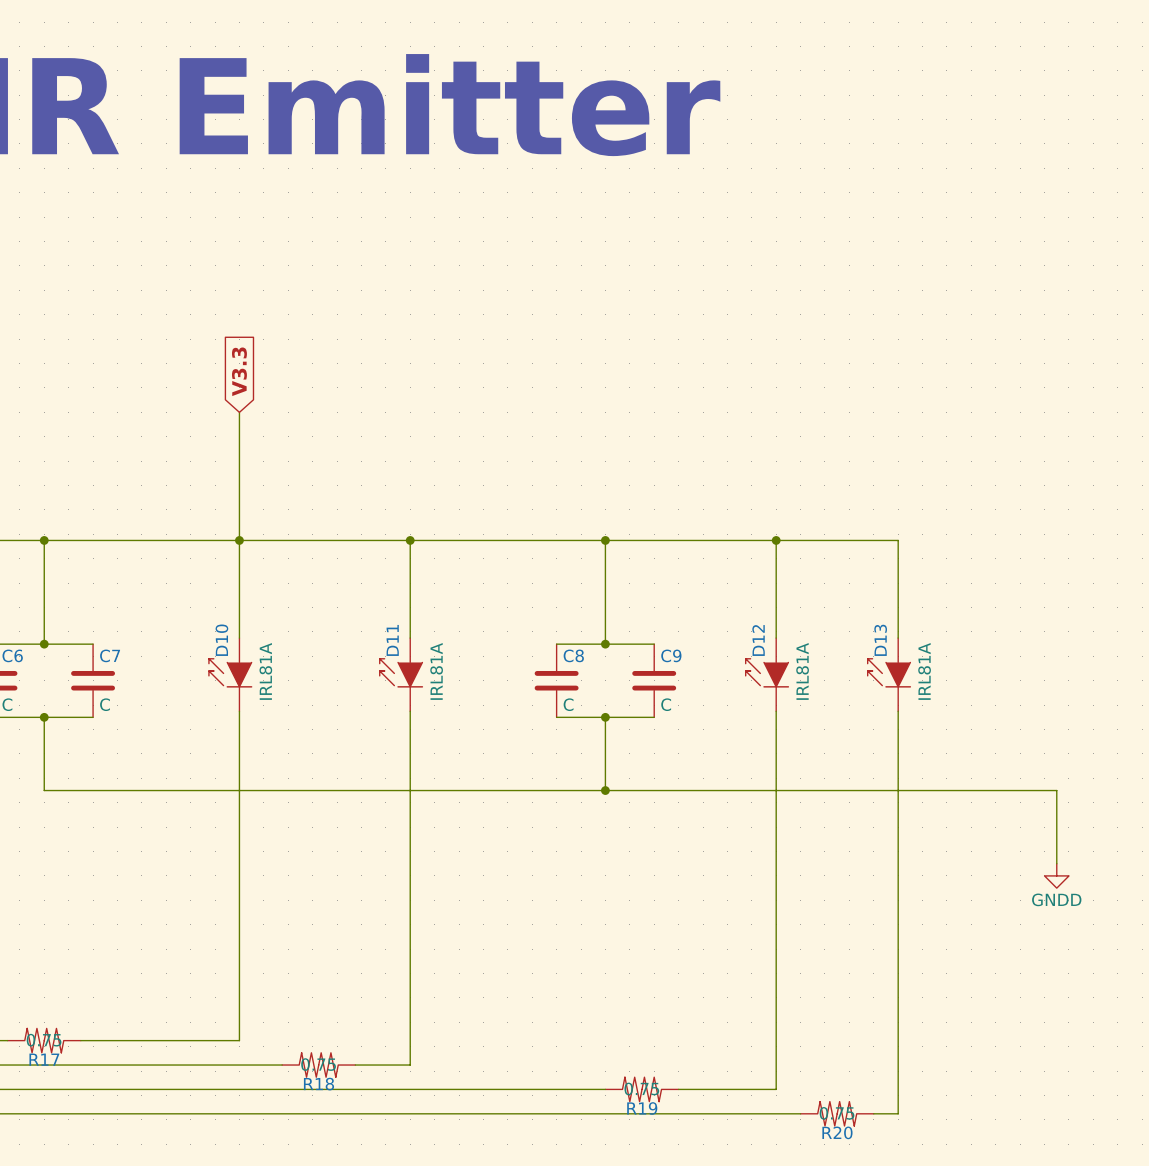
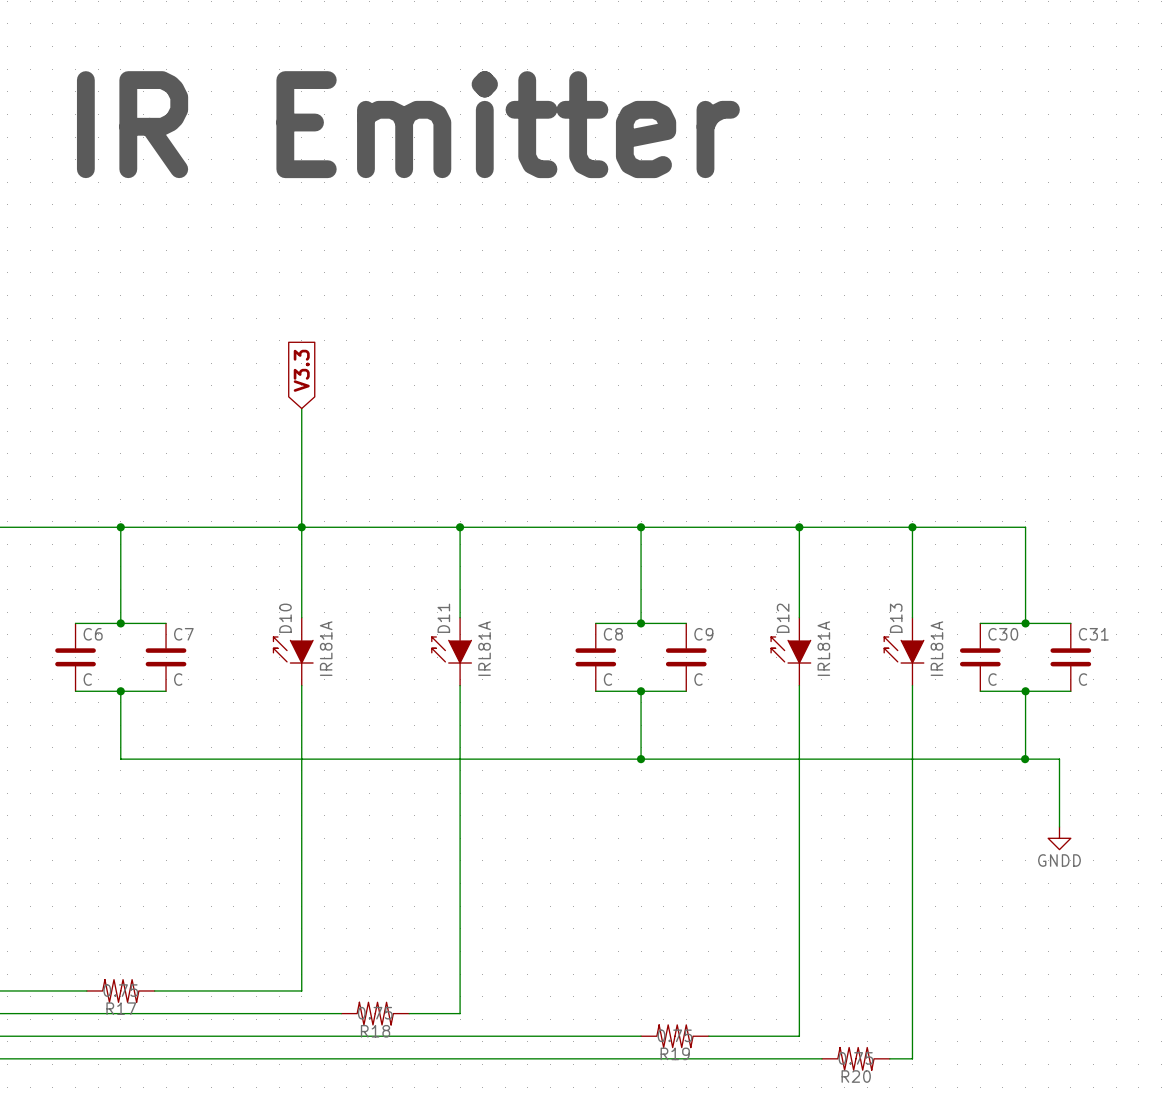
wire: none -> (912, 527) (1025, 527) (1025, 623)
junction: none -> (912, 527)
wire: none -> (980, 623) (1070, 623)
junction: none -> (1025, 623)
C30: none -> C (980, 657)
C31: none -> C (1070, 657)
wire: none -> (980, 691) (1070, 691)
junction: none -> (1025, 691)
wire: none -> (1025, 692) (1025, 759)
junction: none -> (1025, 759)

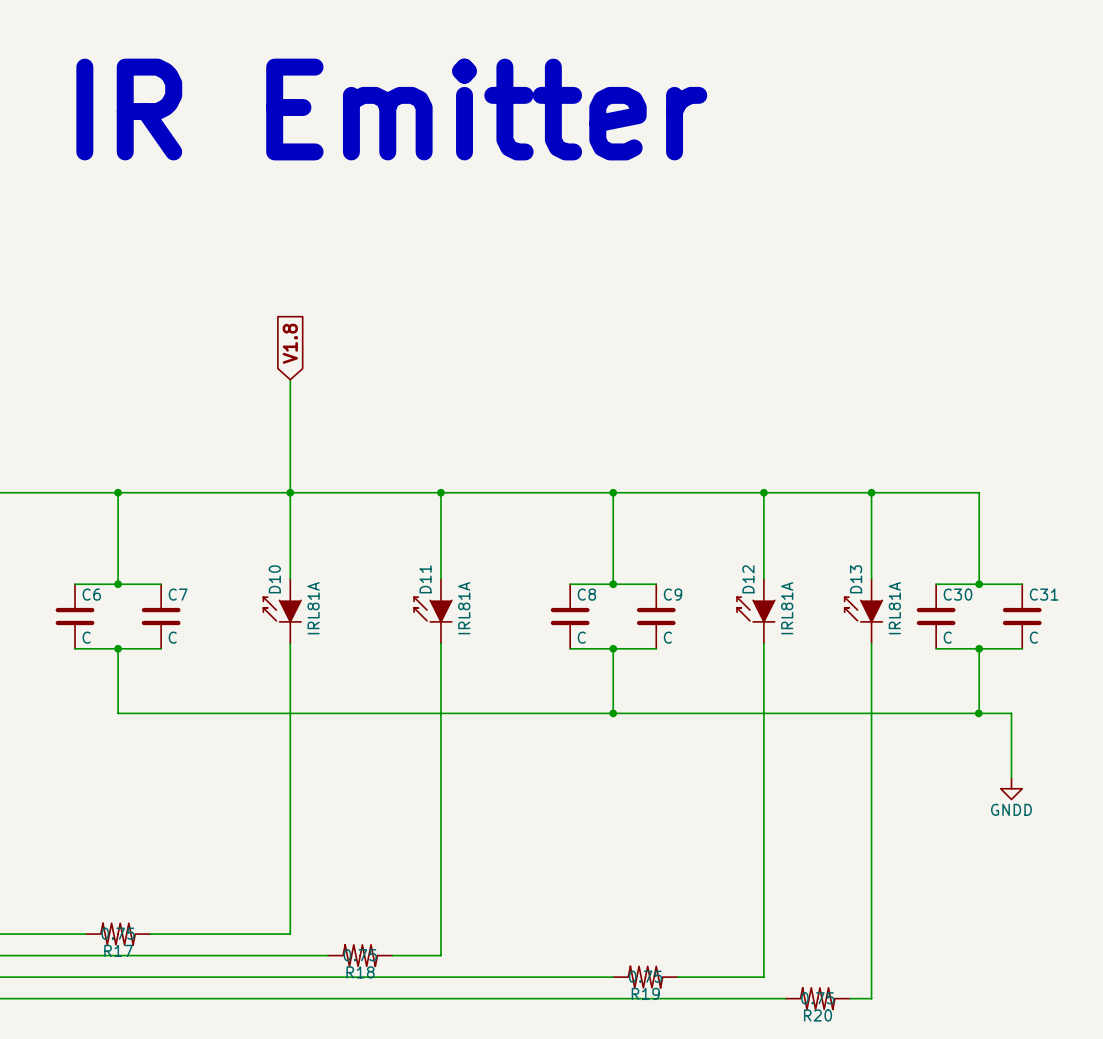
global label: V3.3 (301, 370) -> V1.8 (290, 343)

